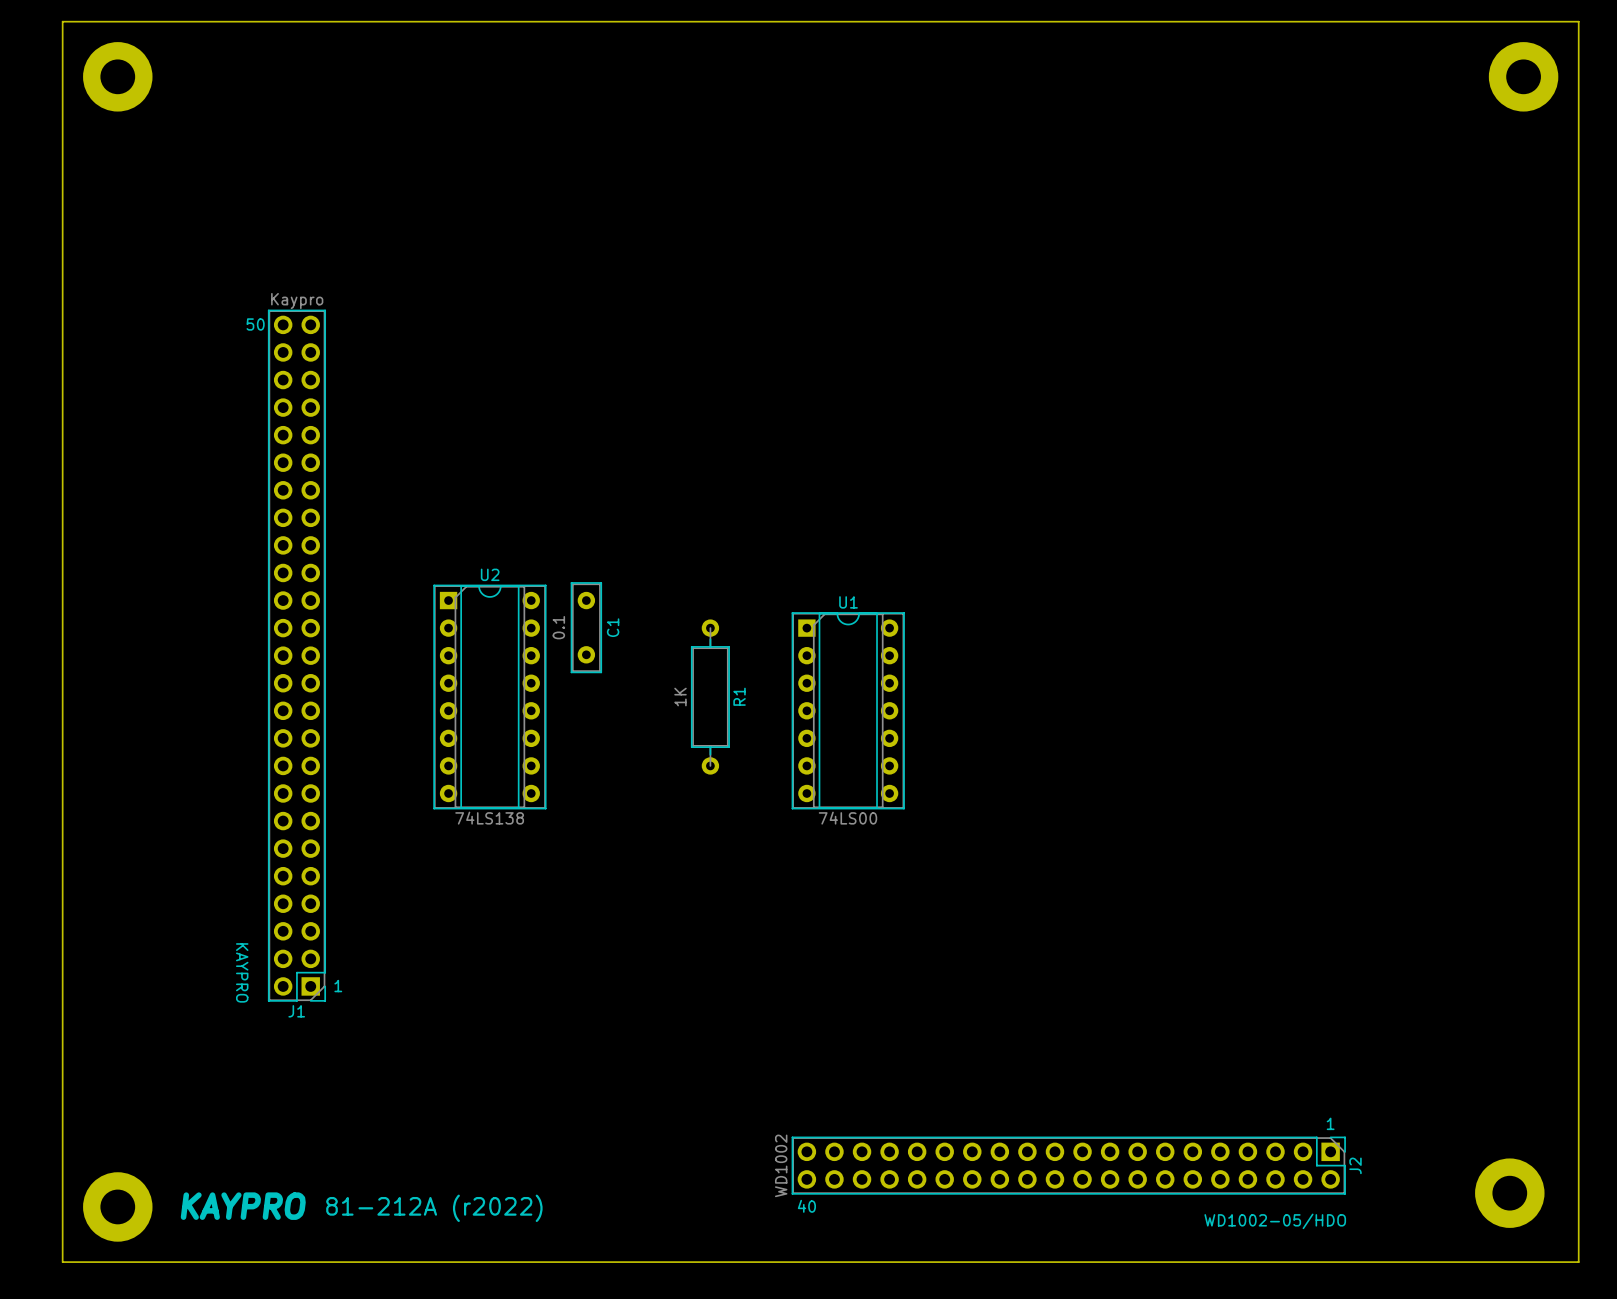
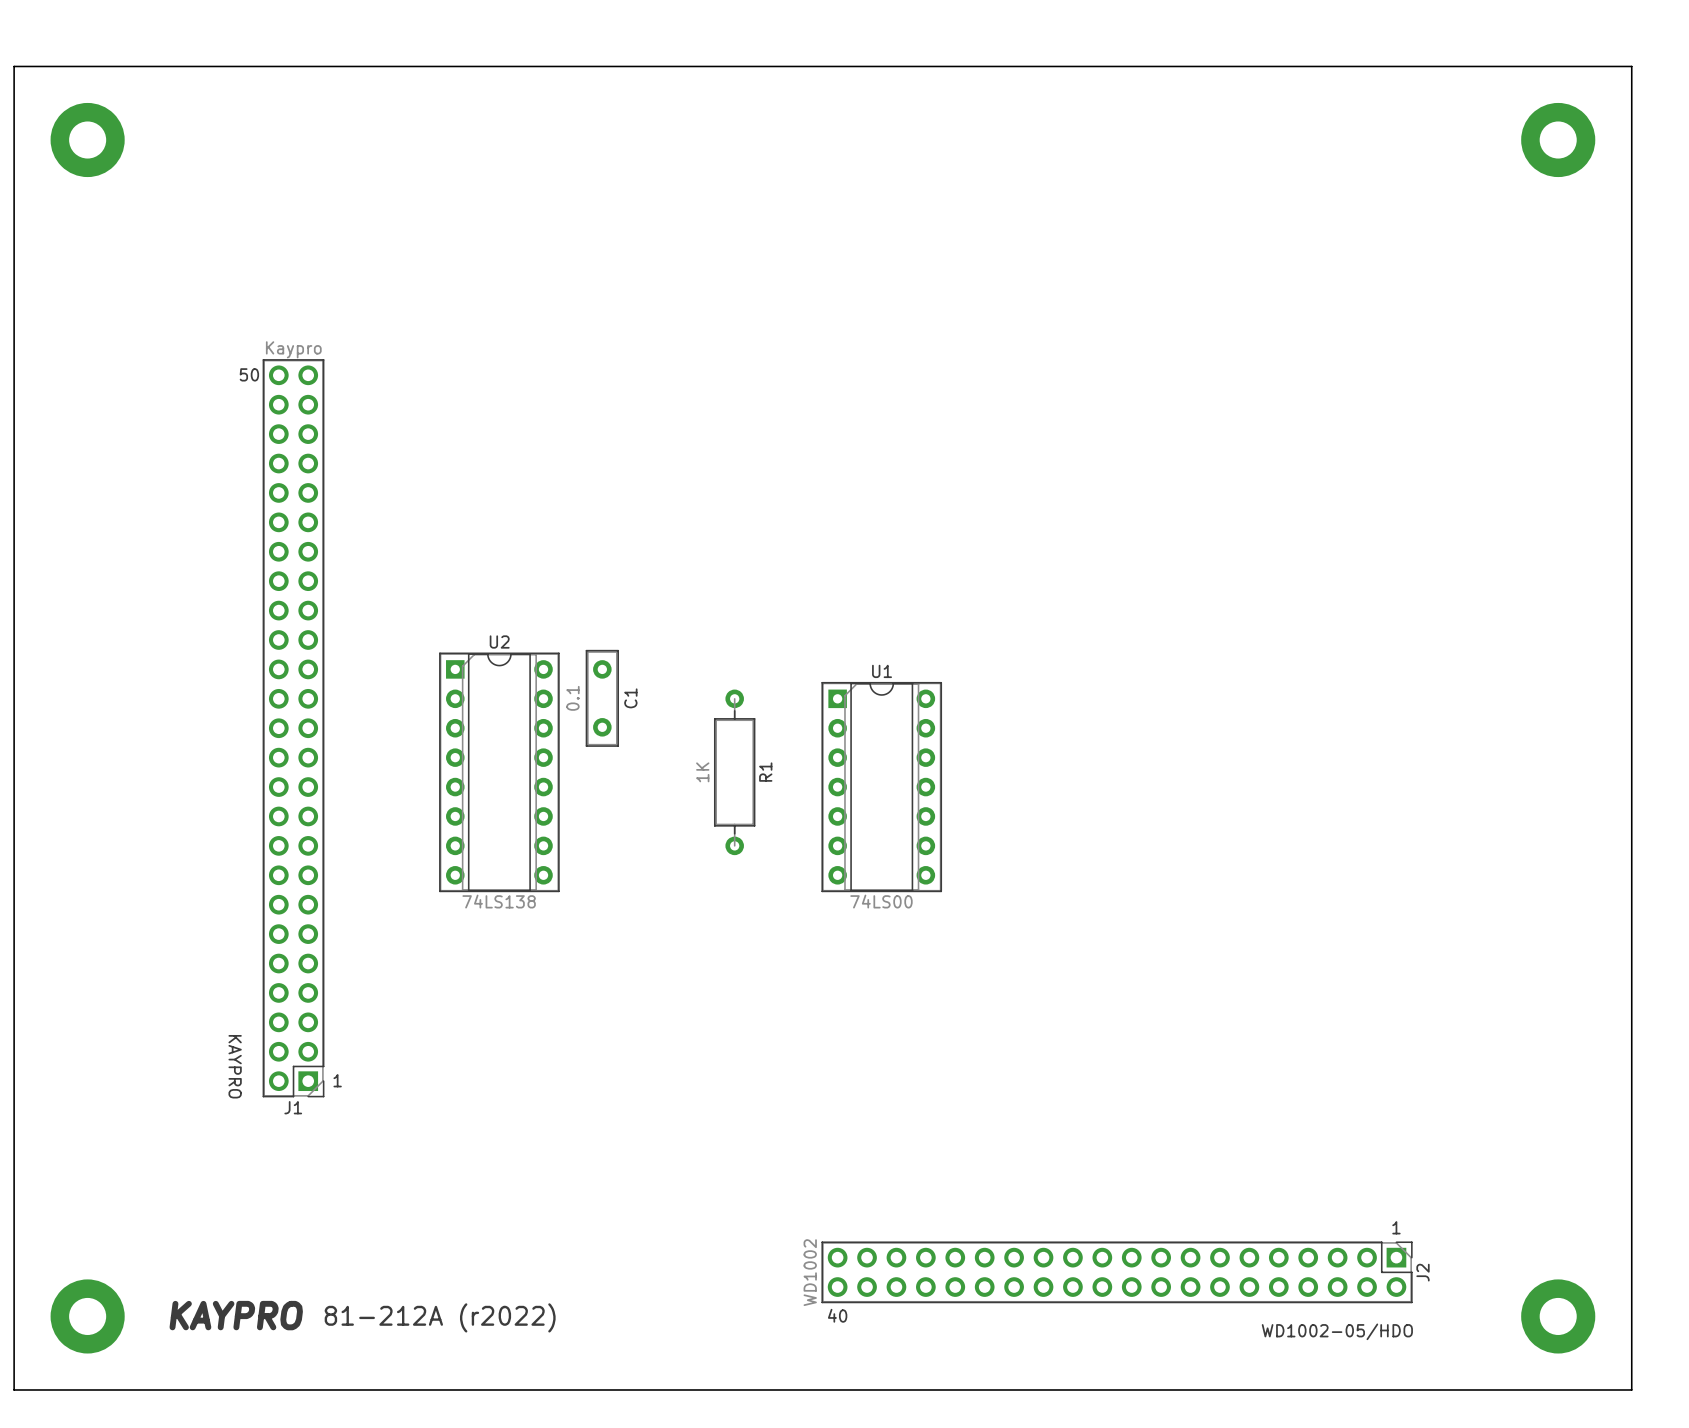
board edge: (62, 21) (62, 1262) (1578, 1262) (1578, 21) (62, 21) -> (14, 66) (14, 1389) (1631, 1389) (1631, 66) (14, 66)
part position: (117, 76) -> (87, 140)
part position: (1523, 76) -> (1558, 140)
part position: (1509, 1193) -> (1558, 1316)
part position: (117, 1206) -> (87, 1316)

